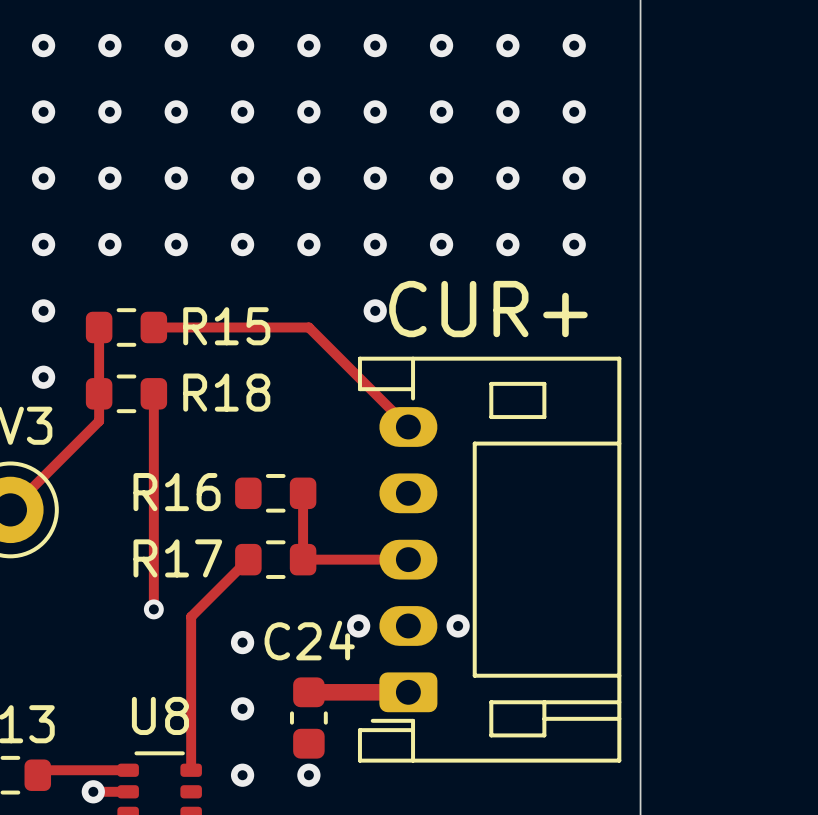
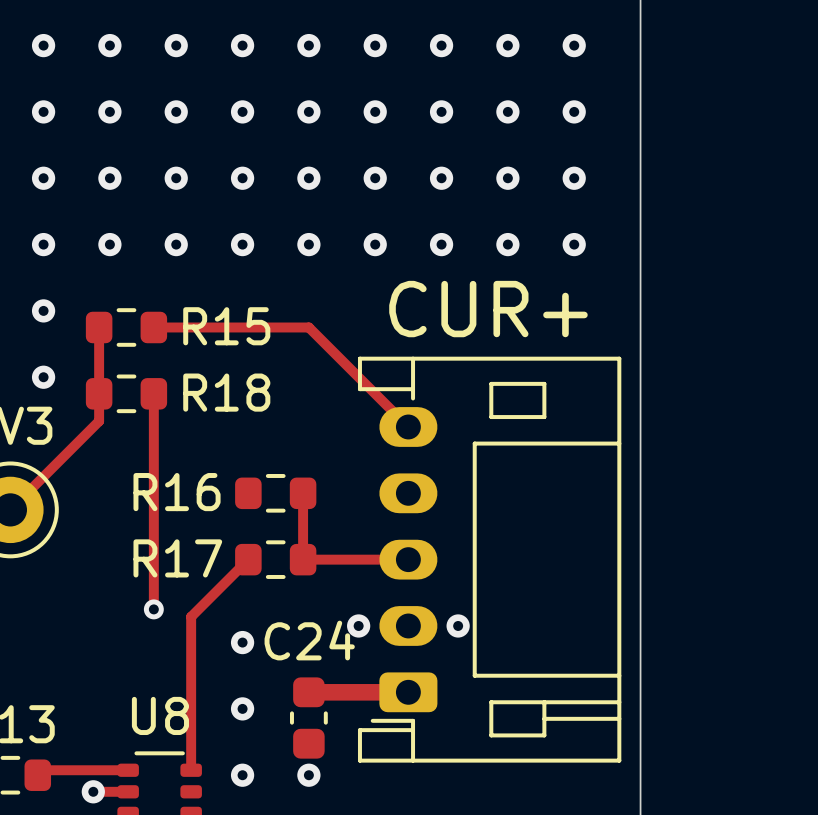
via: (375, 310) -> none

